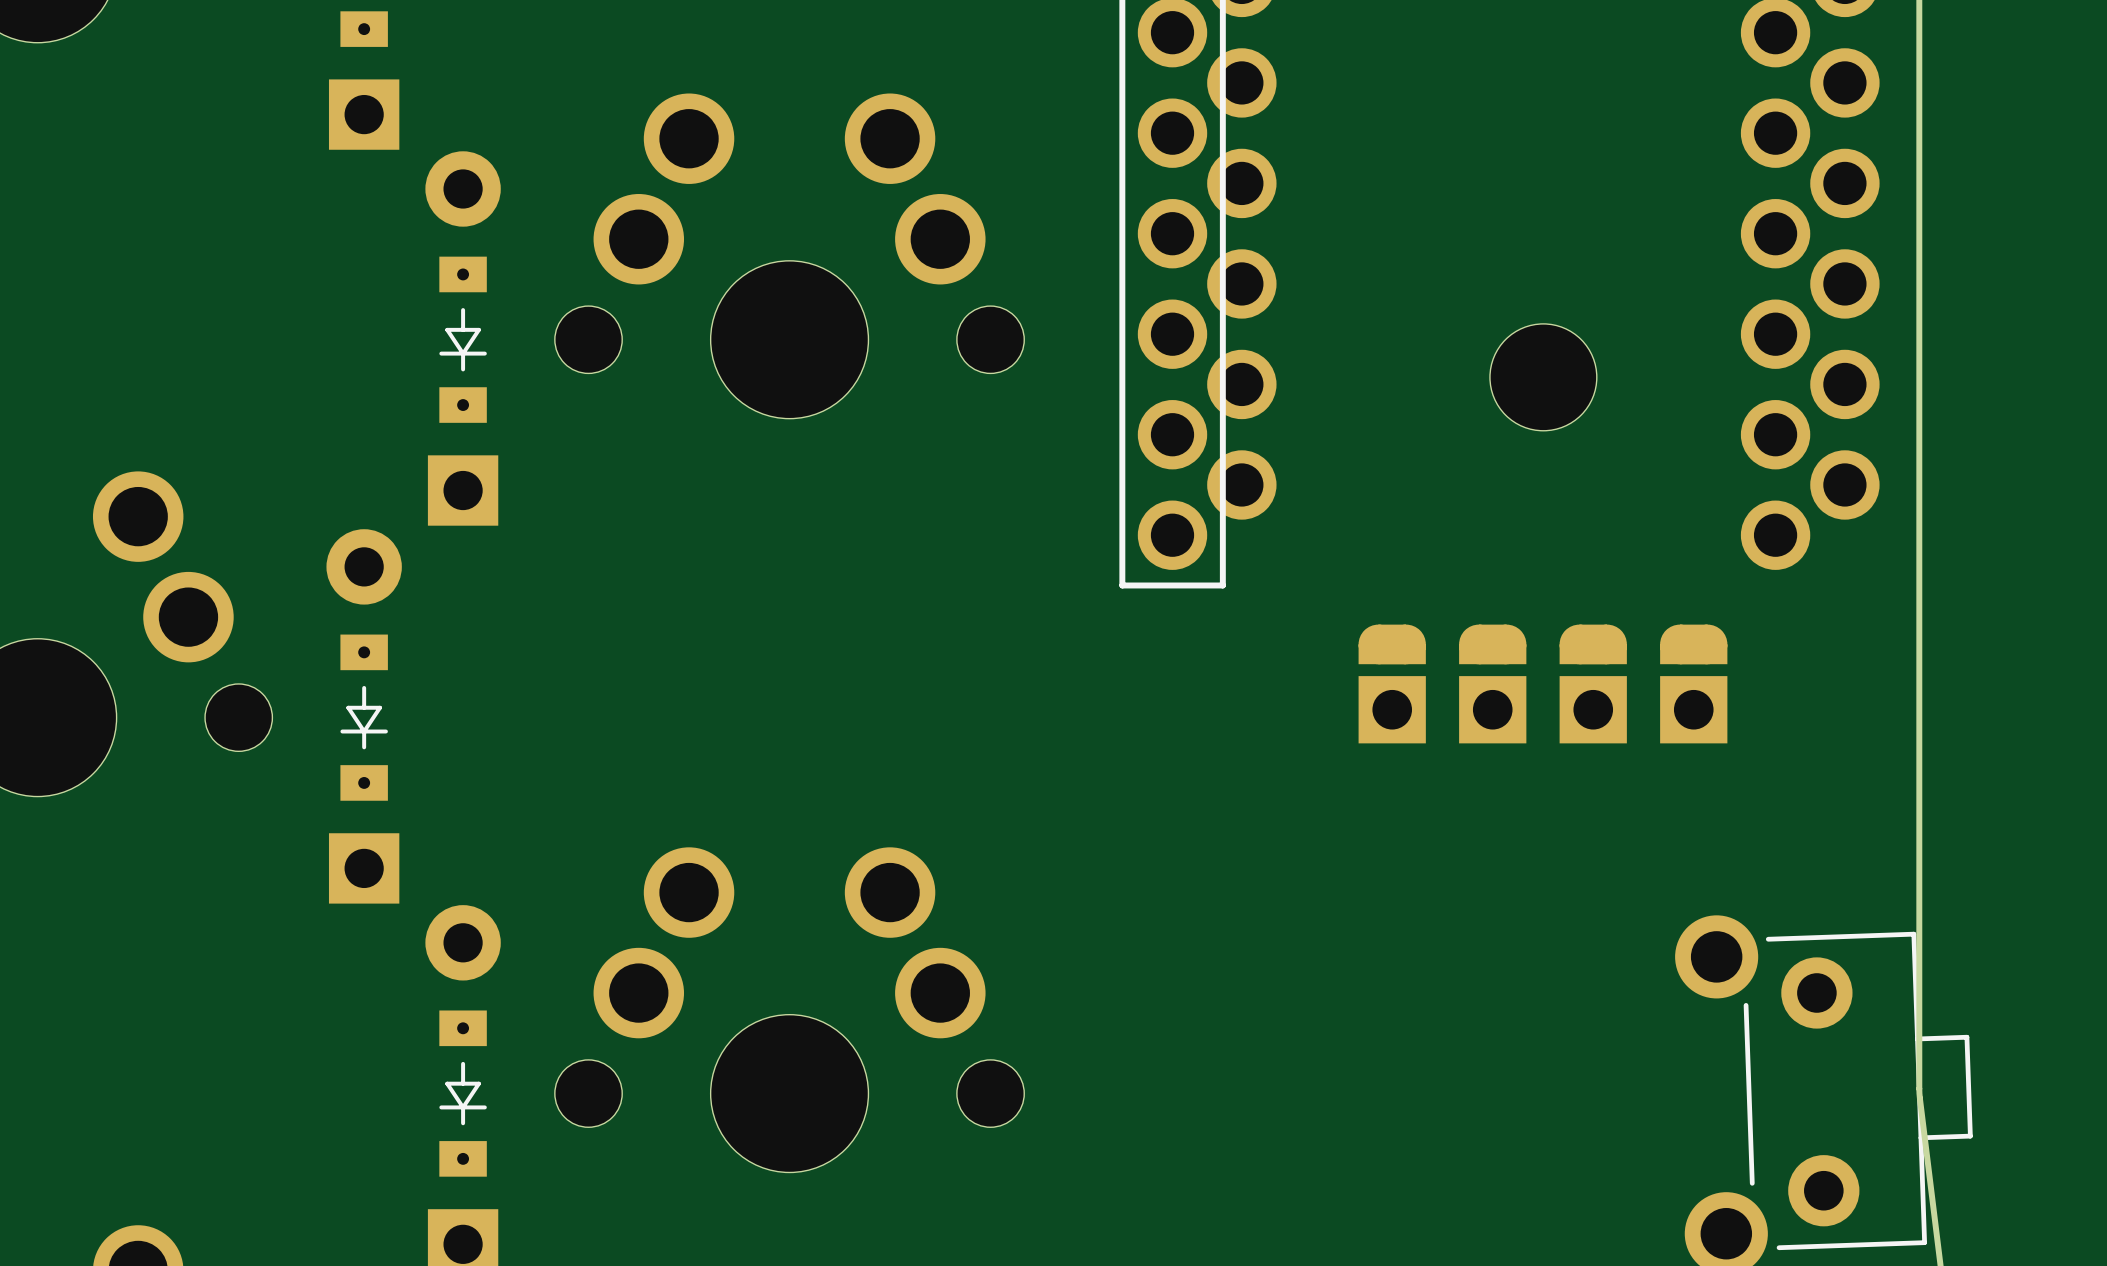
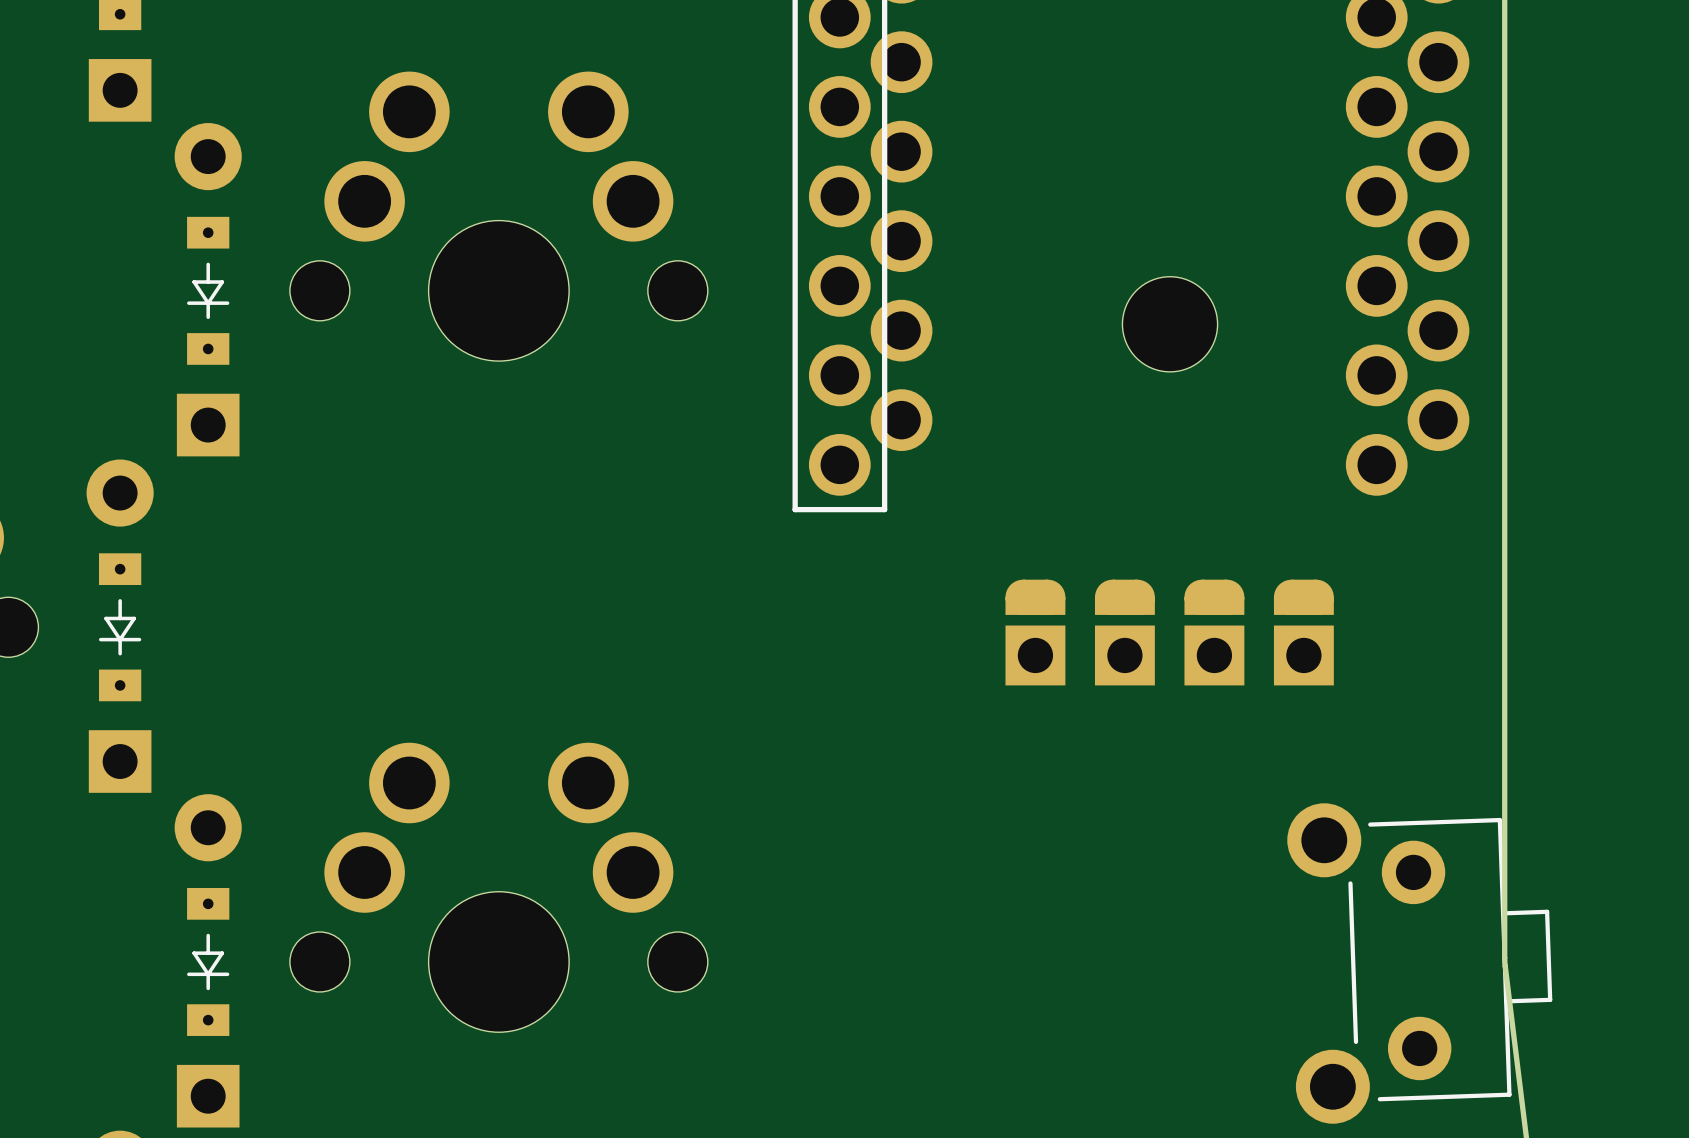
part position: (1542, 684) -> (1169, 632)

